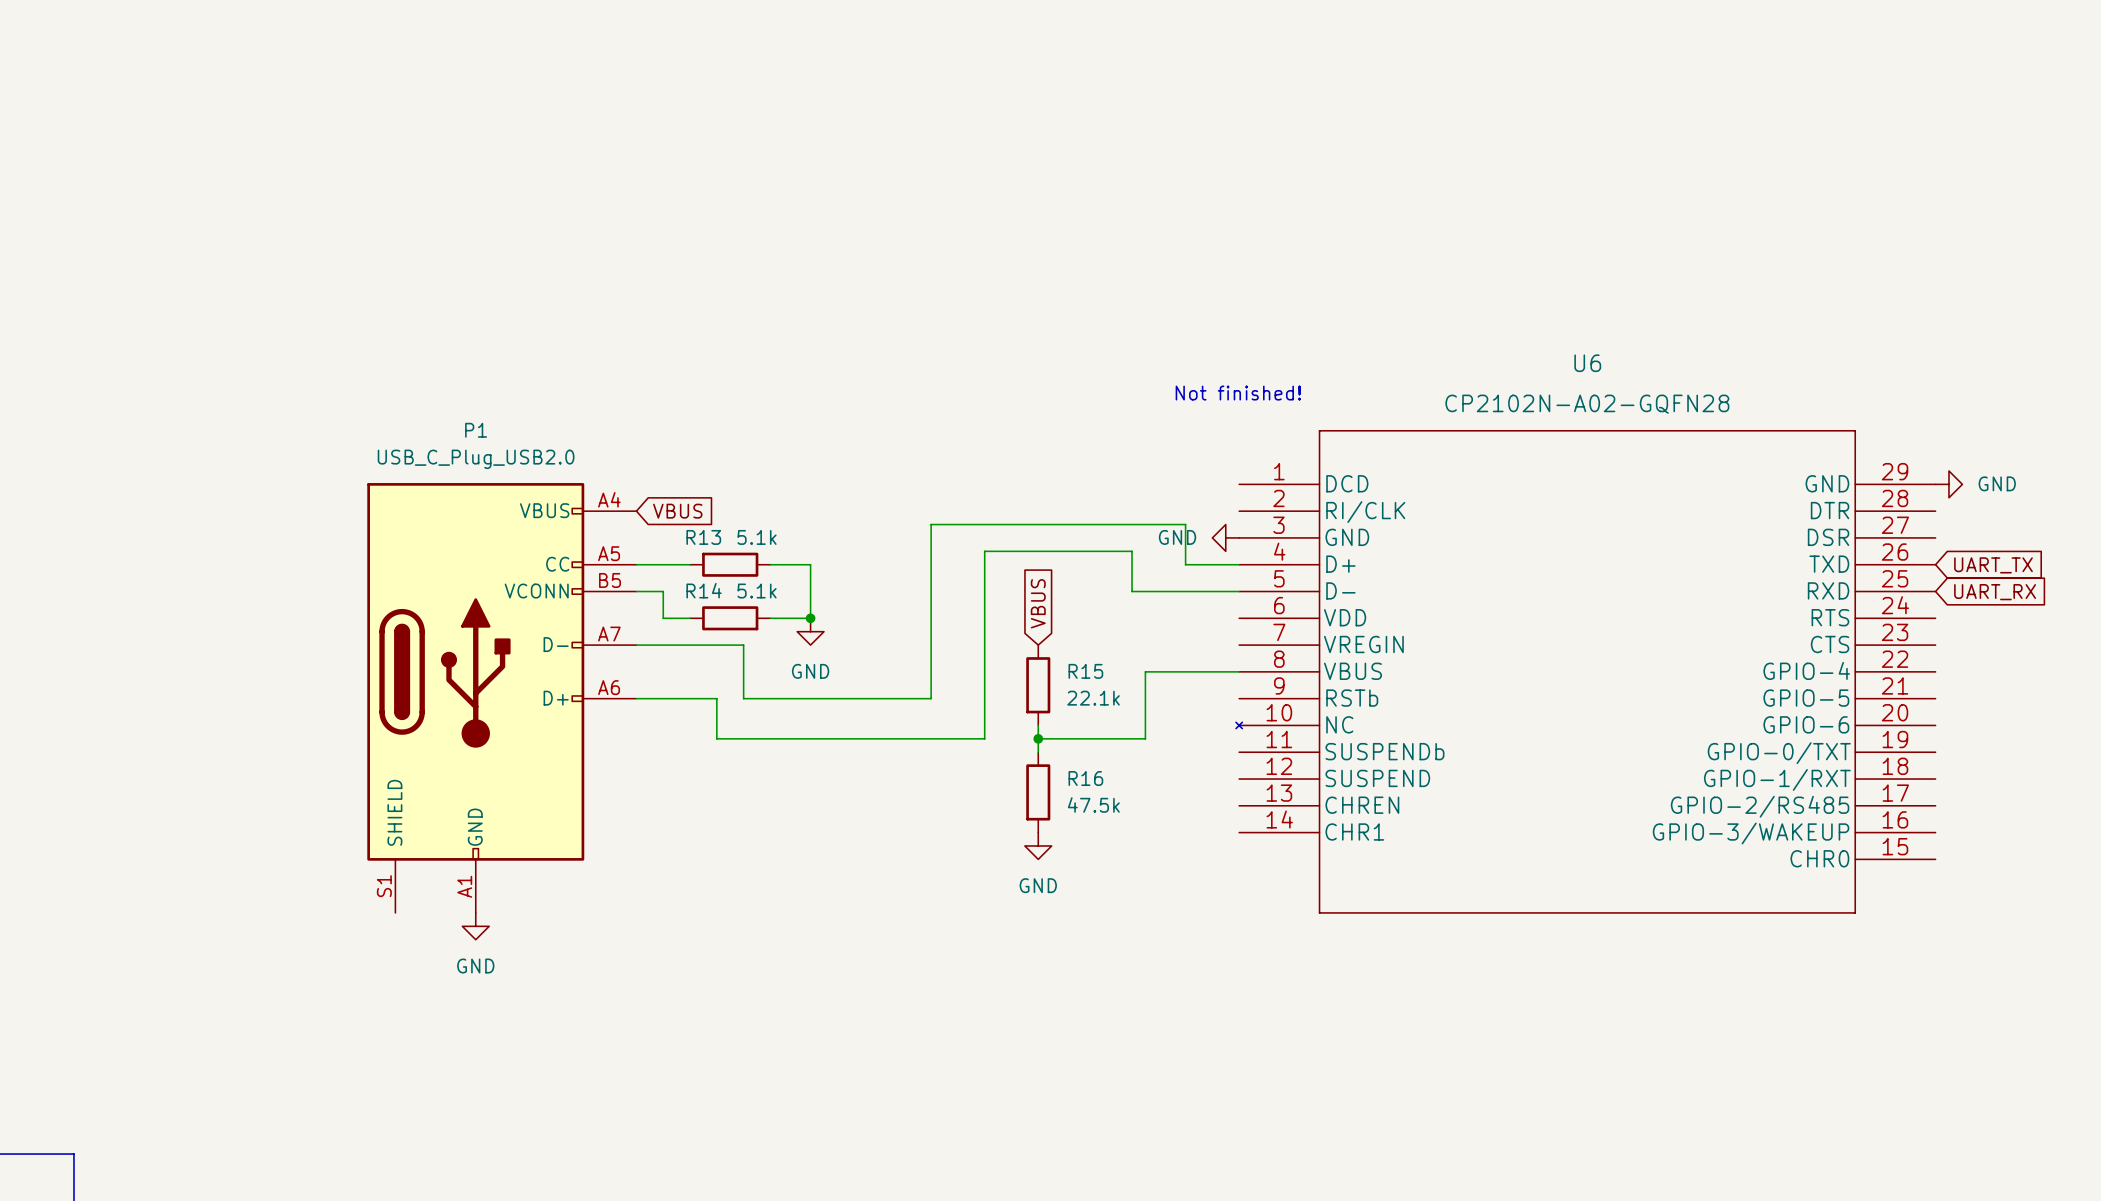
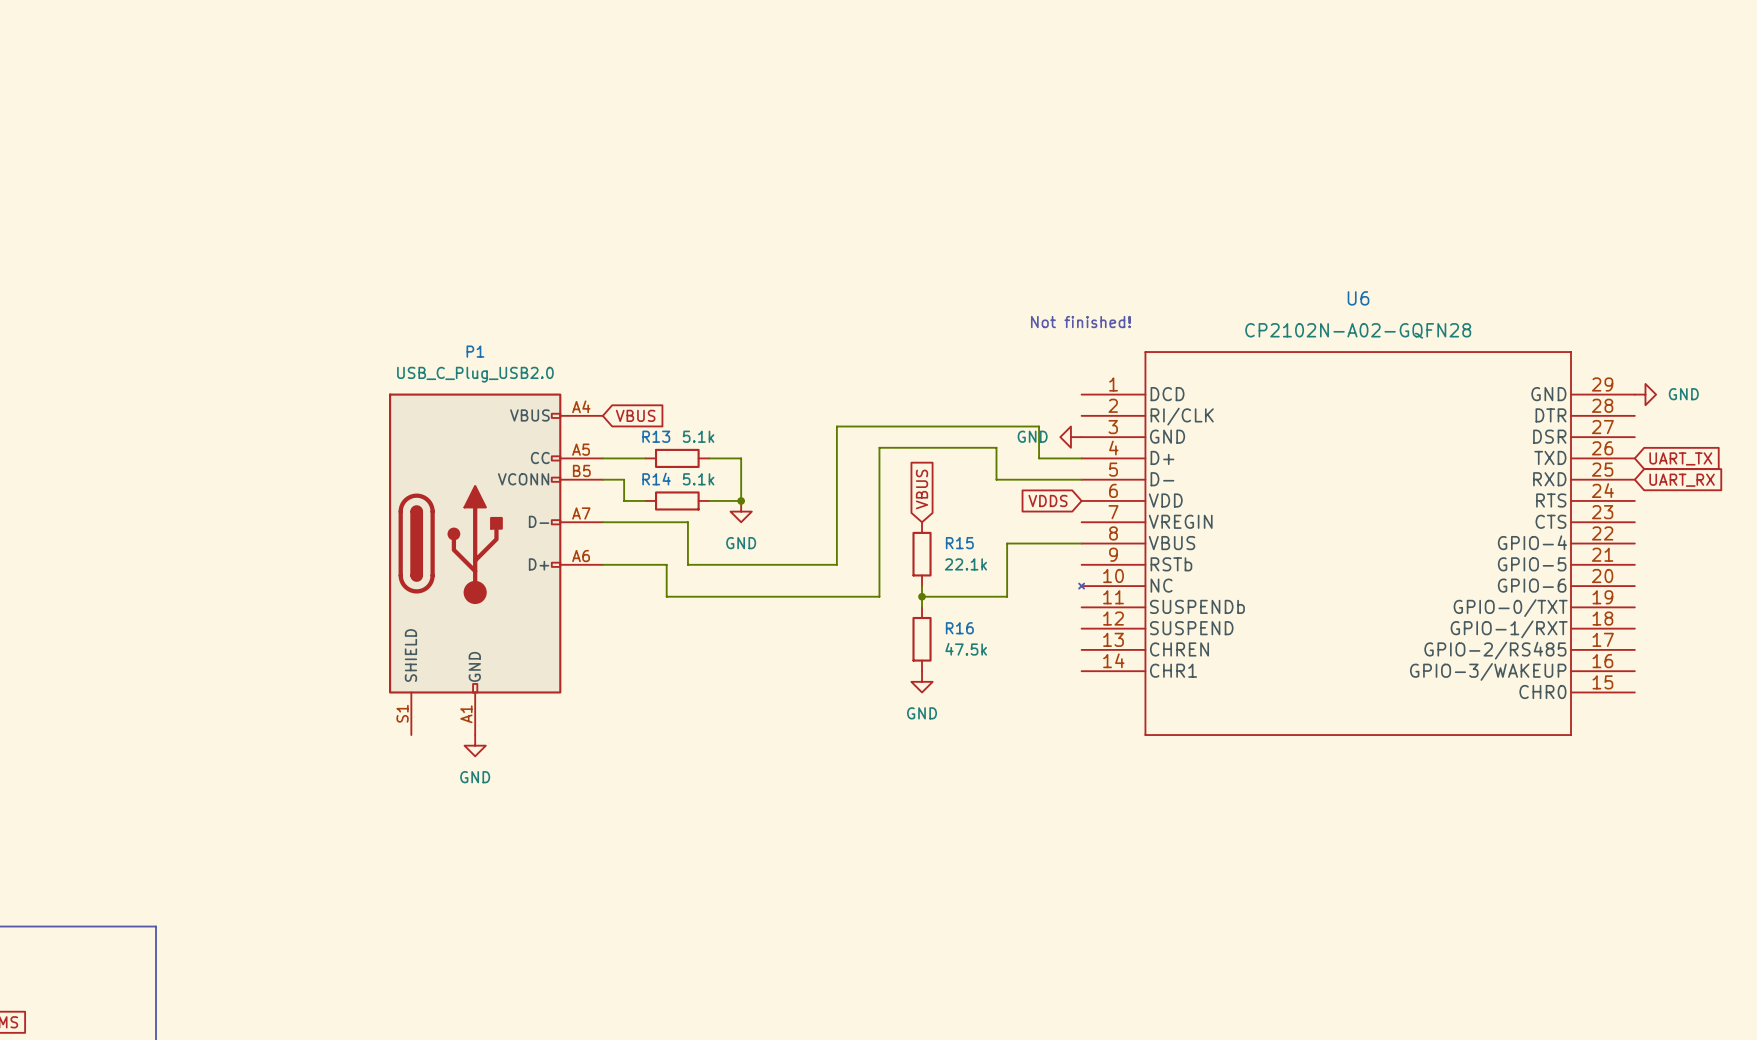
global label: none -> VDDS (1048, 500)

